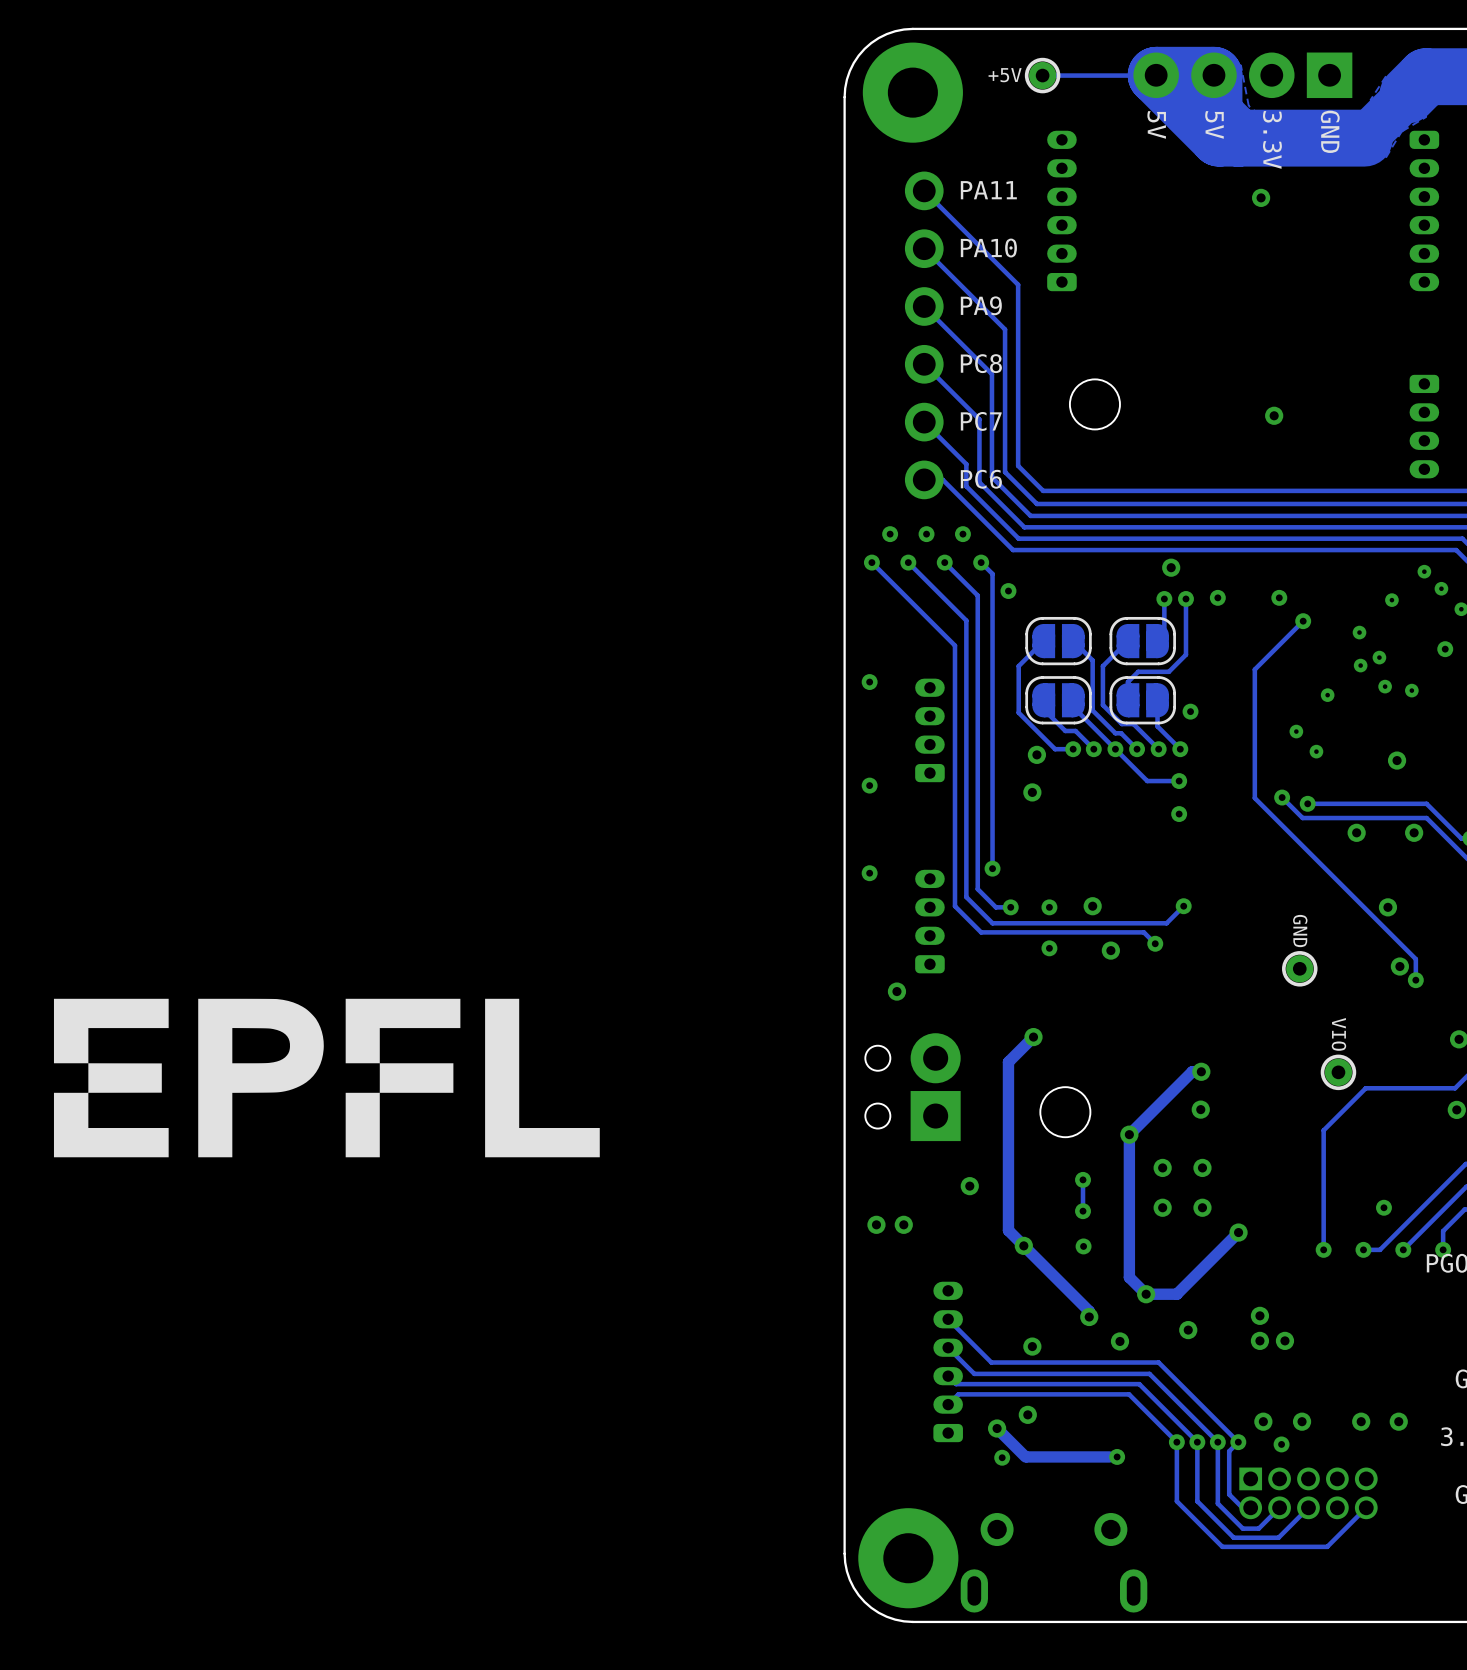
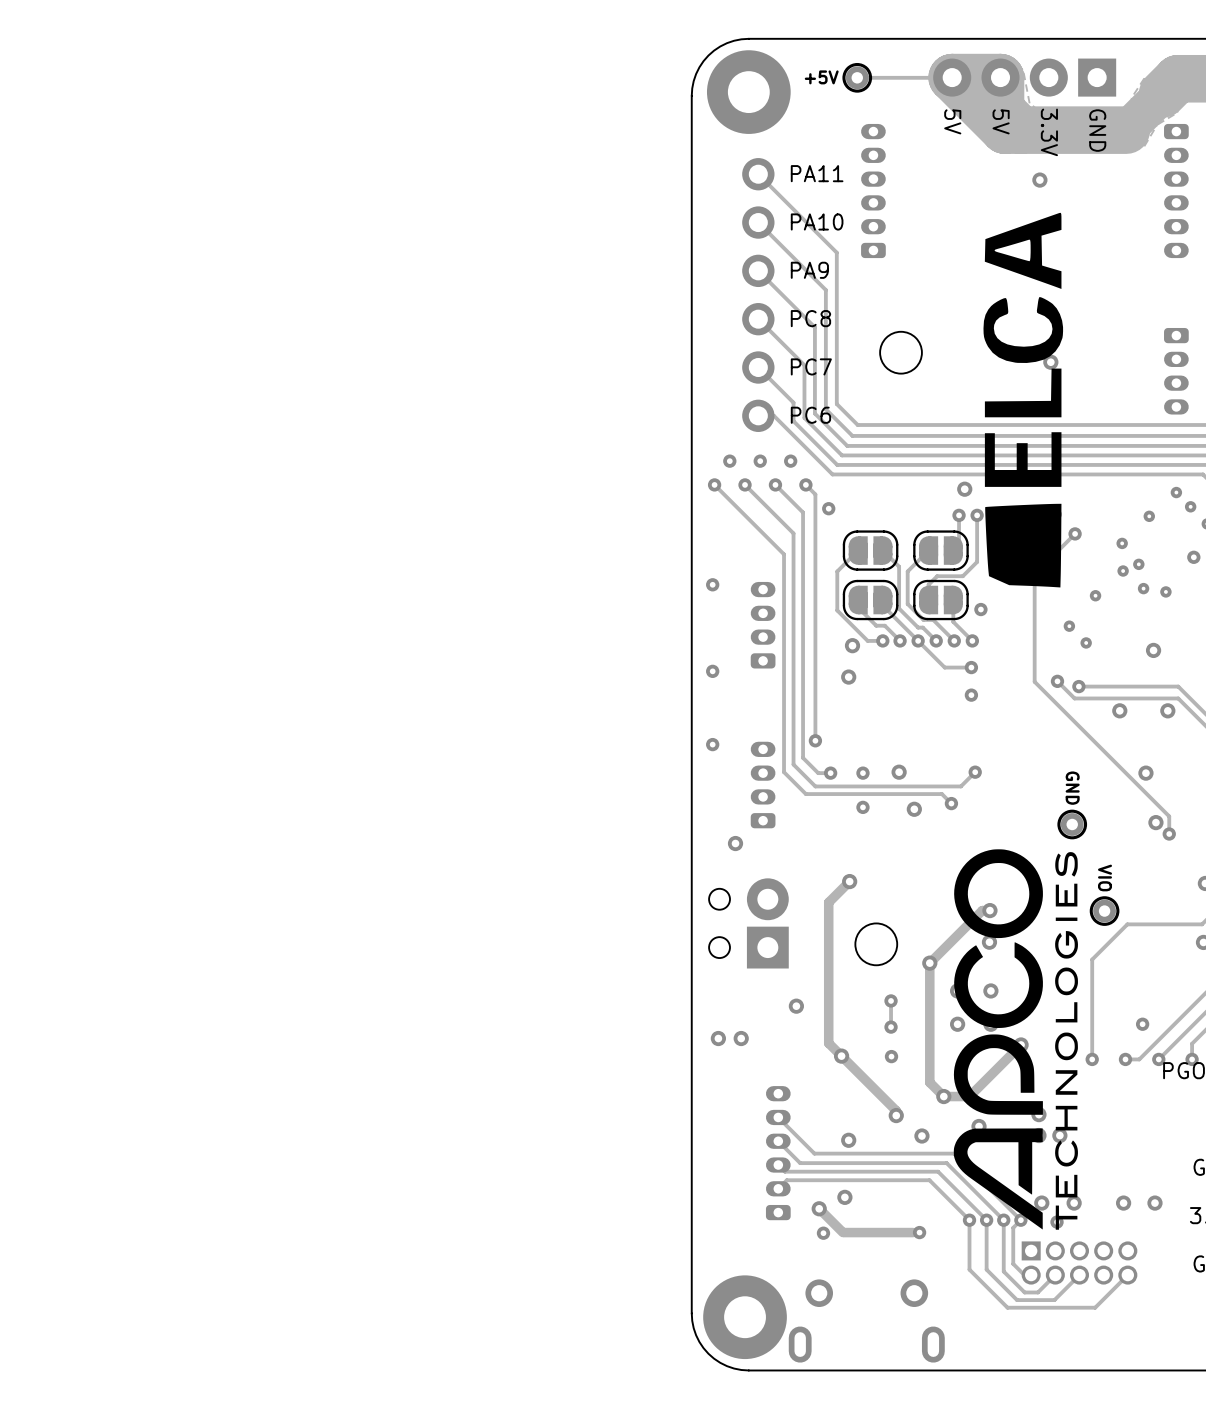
drawing: none -> [983, 212, 1064, 588]
drawing: [53, 998, 600, 1158] -> none
drawing: none -> [953, 849, 1078, 1230]

